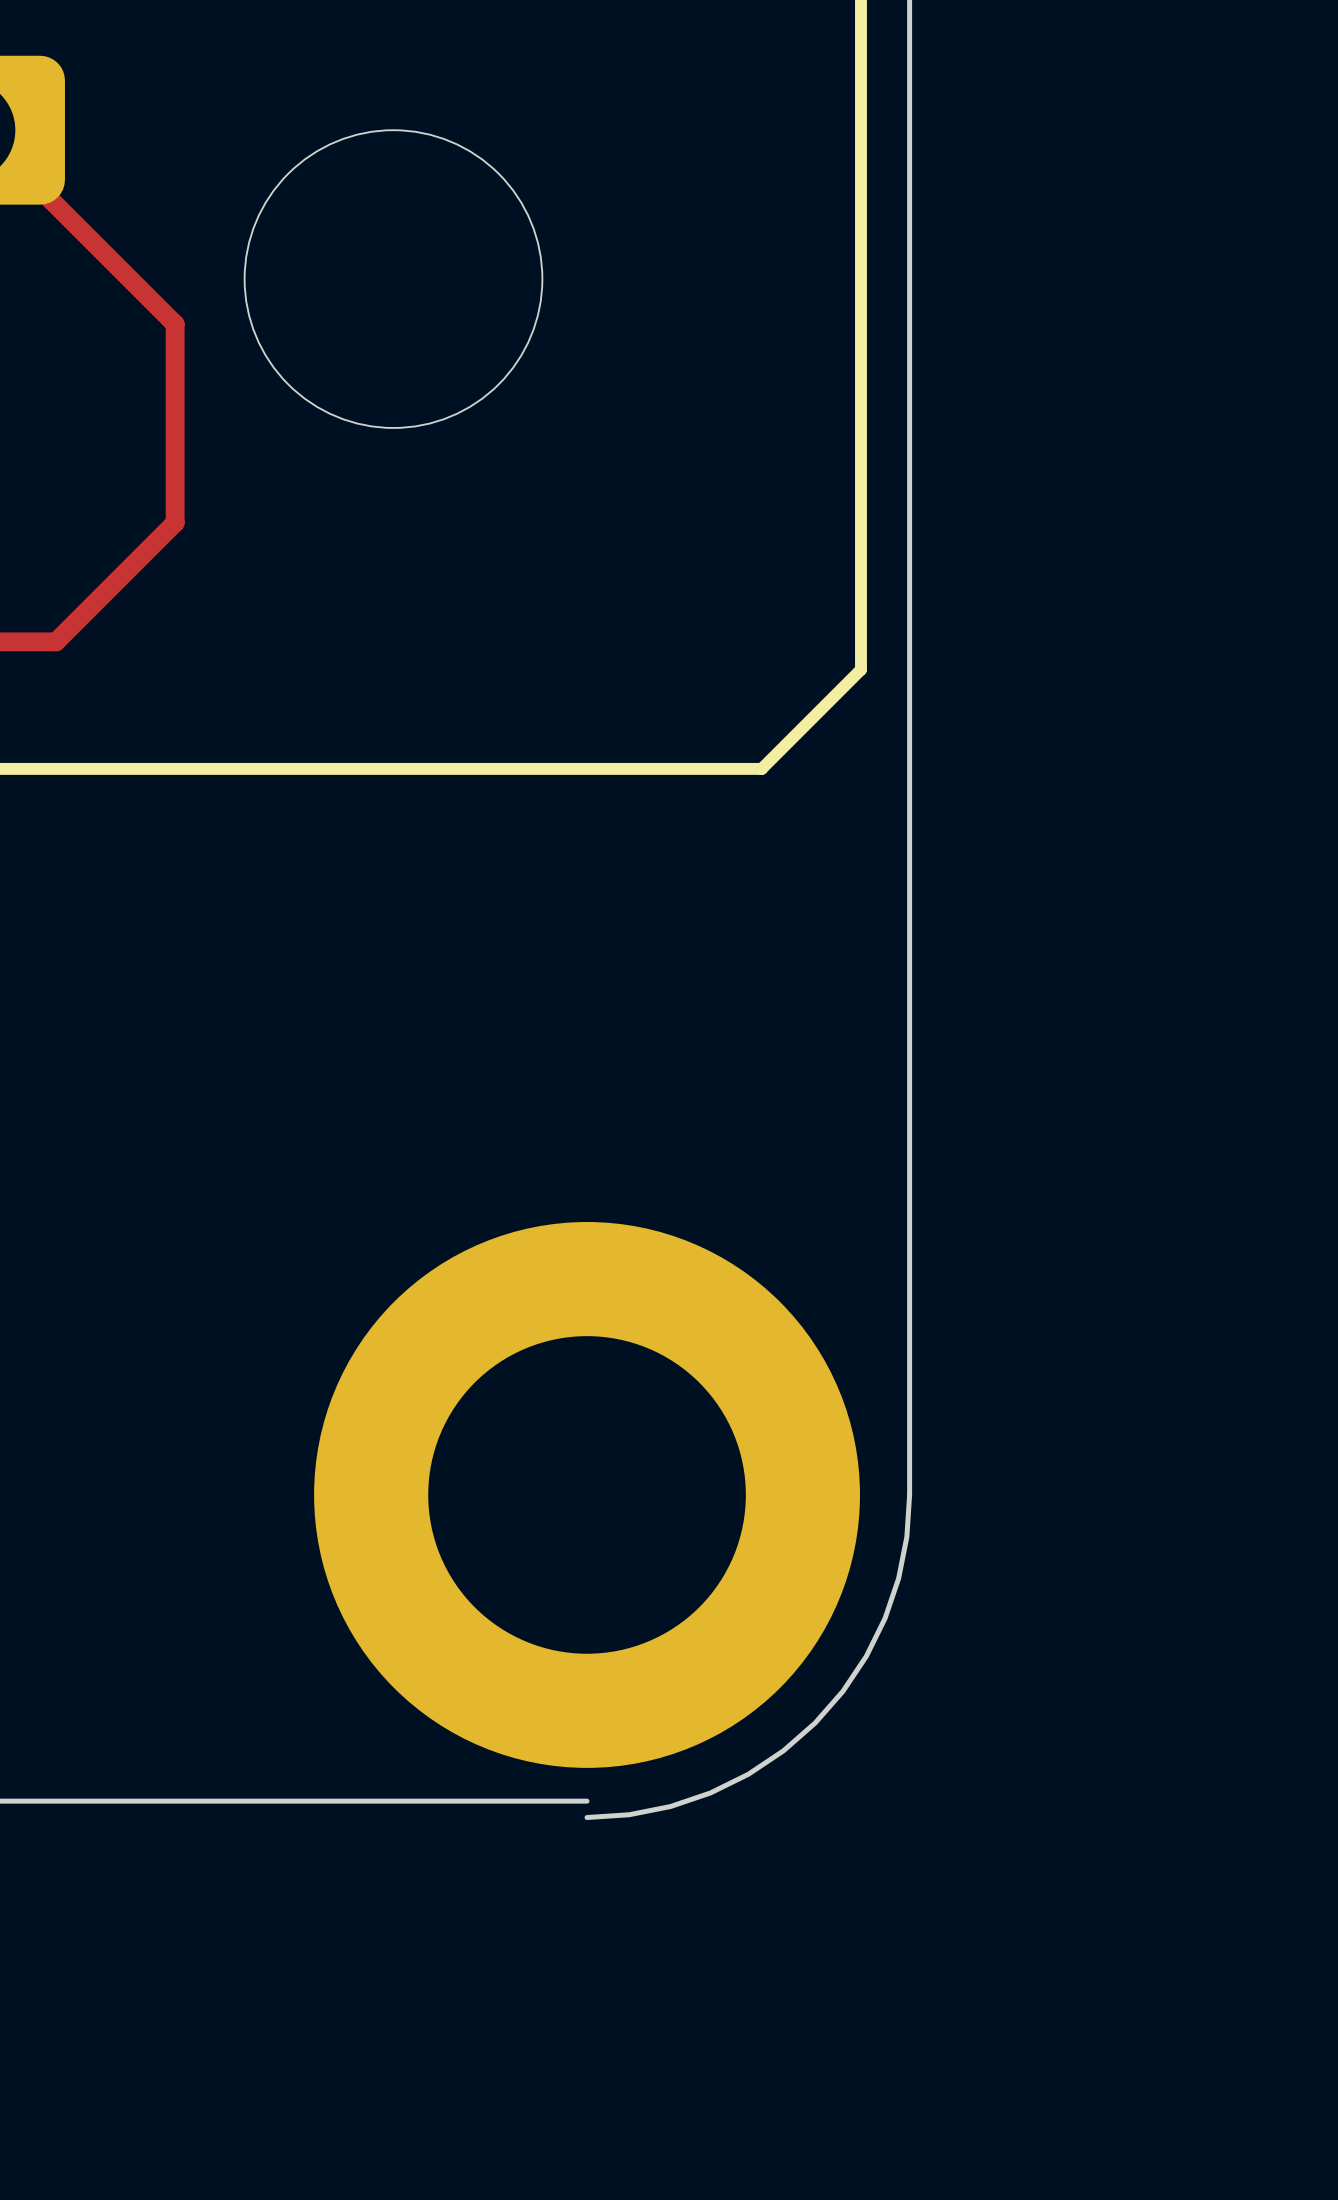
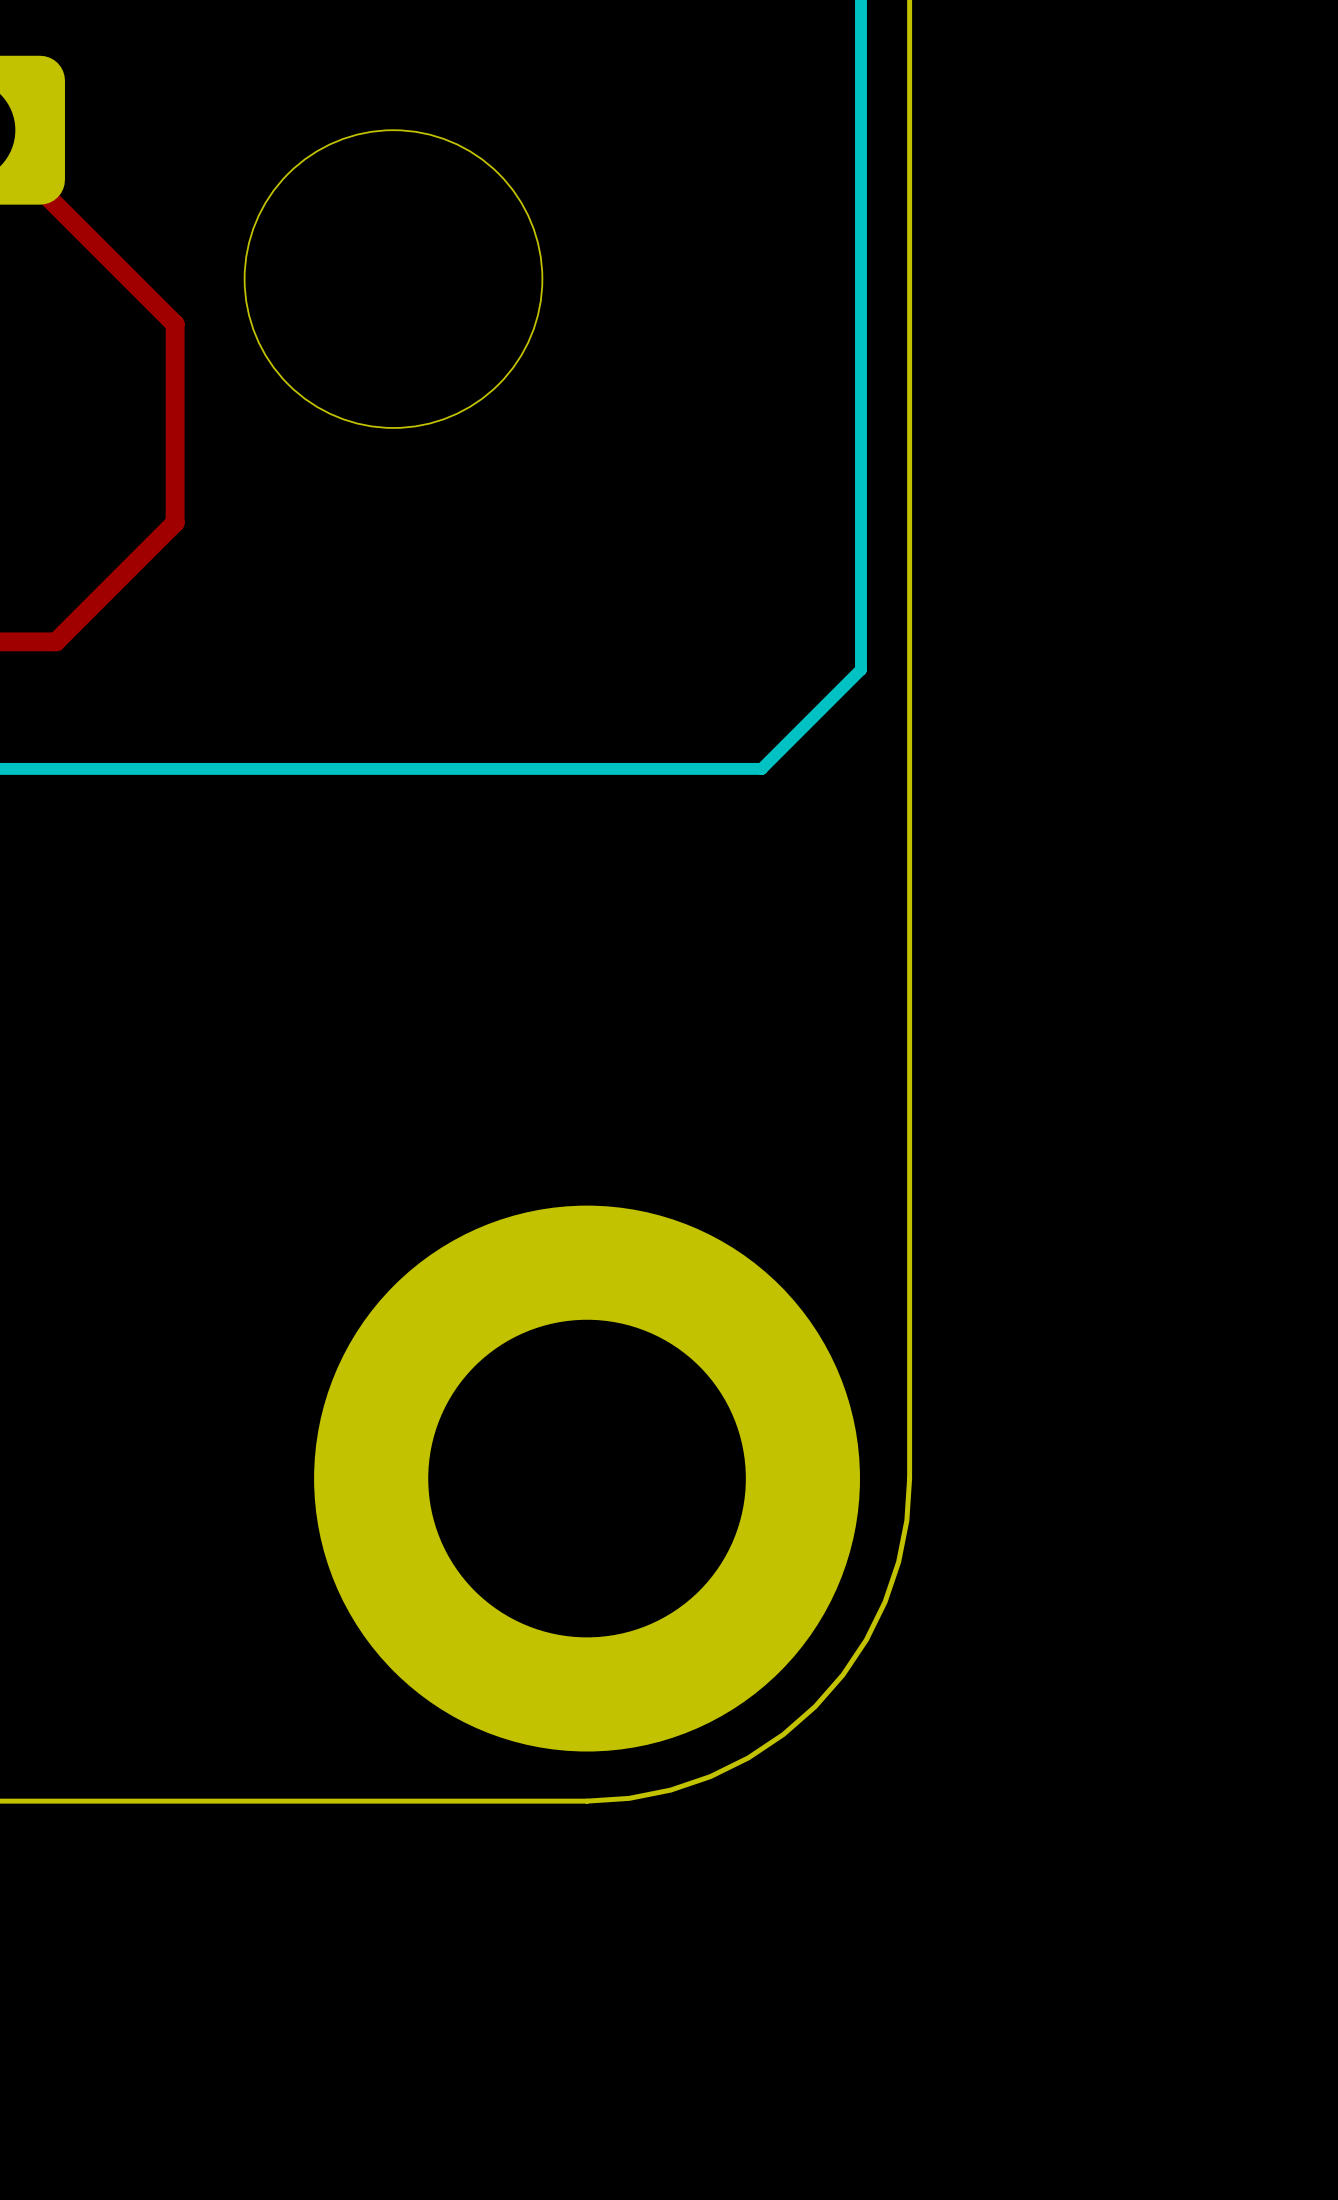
board edge: (909, 1478) (906, 1537) (898, 1578) (885, 1618) (866, 1656) (842, 1691) (815, 1723) (783, 1750) (748, 1774) (710, 1792) (670, 1806) (629, 1814) (587, 1817) -> (909, 1478) (906, 1520) (898, 1562) (885, 1602) (866, 1639) (842, 1674) (815, 1706) (783, 1734) (748, 1757) (710, 1776) (670, 1790) (629, 1798) (587, 1801)
part position: (587, 1494) -> (587, 1478)

